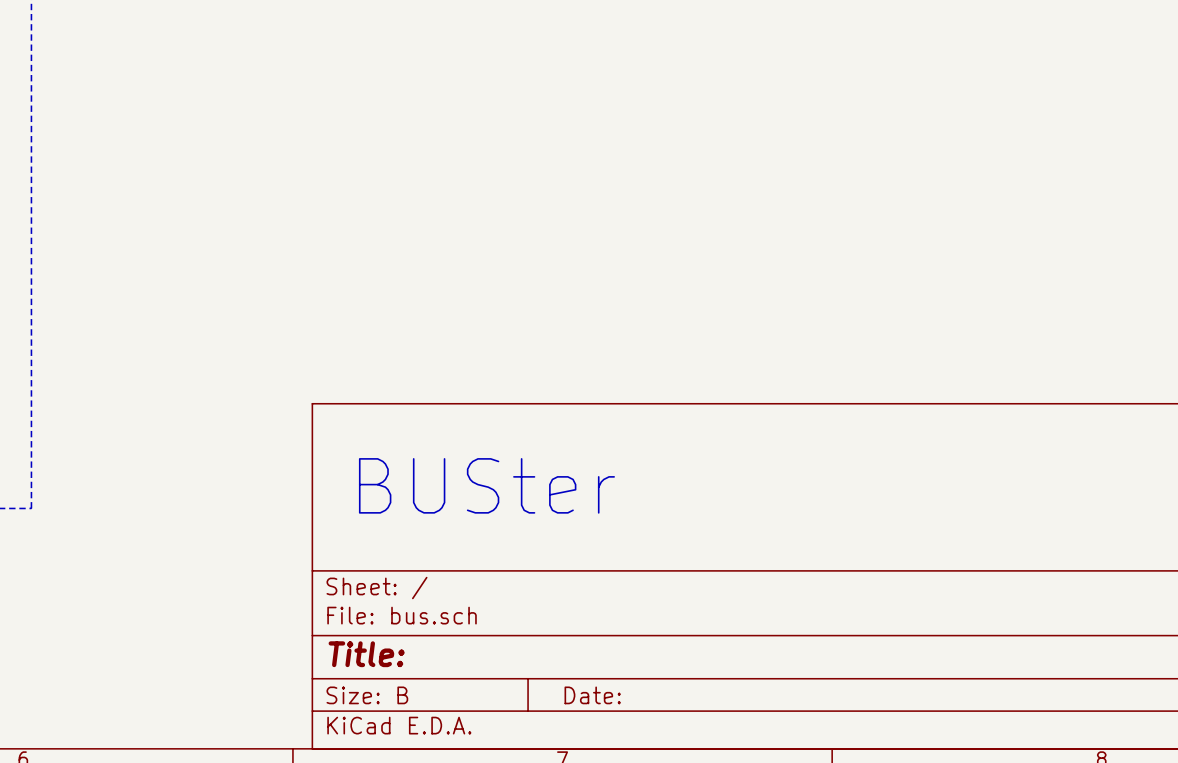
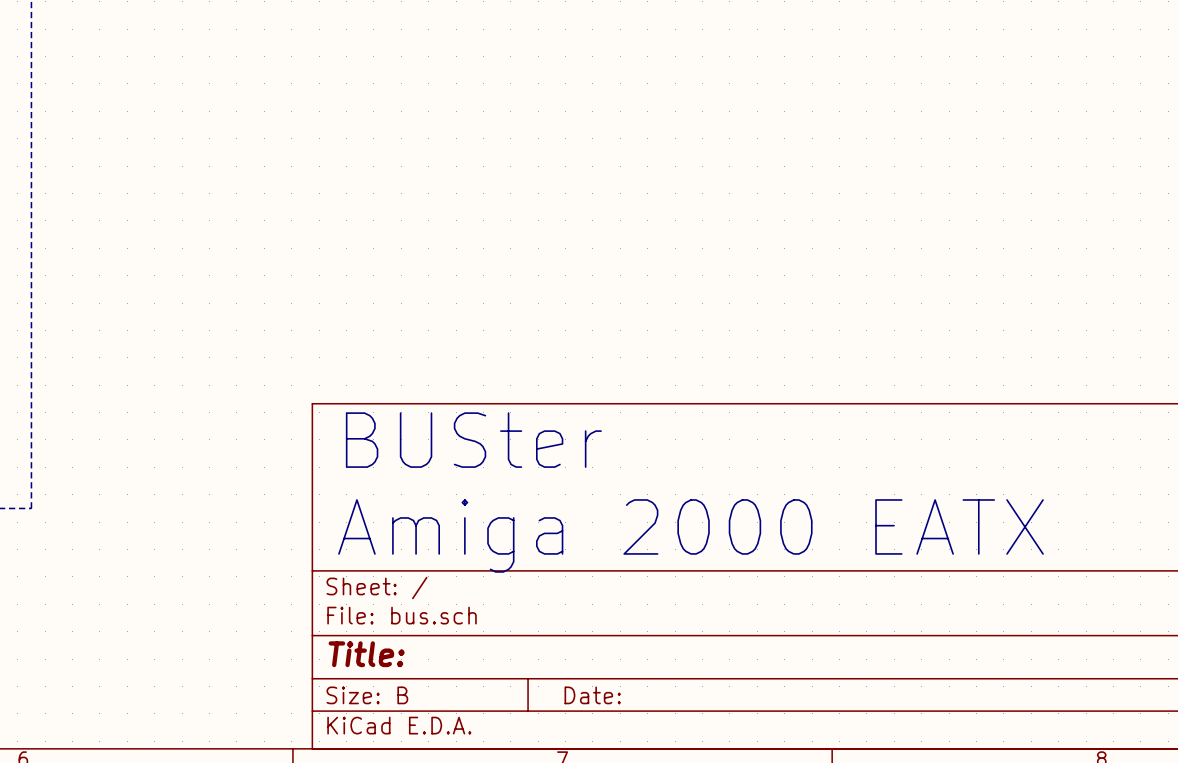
text: none -> BUSter (473, 440)
text: BUSter (486, 485) -> none
text: none -> Amiga 2000 EATX (691, 535)

